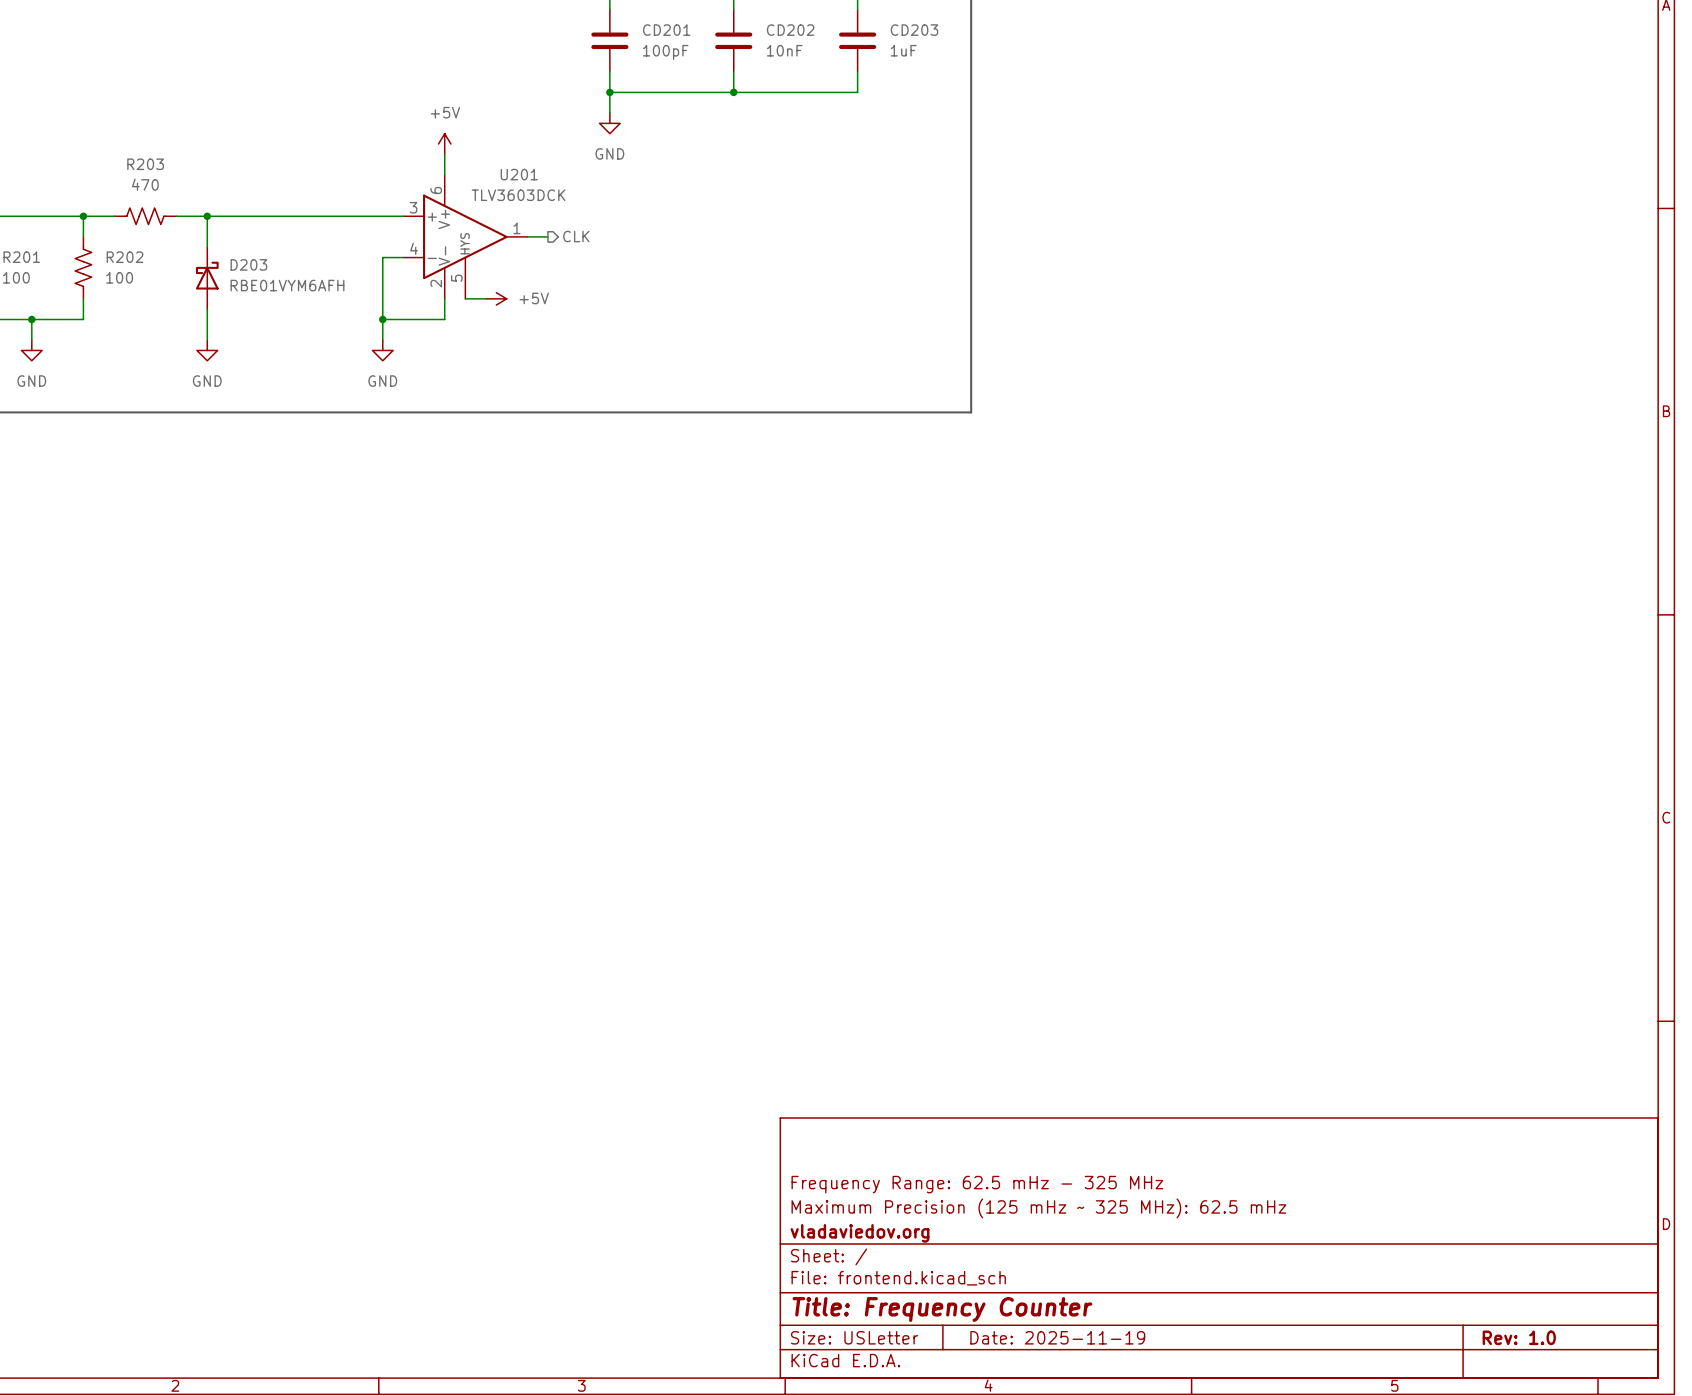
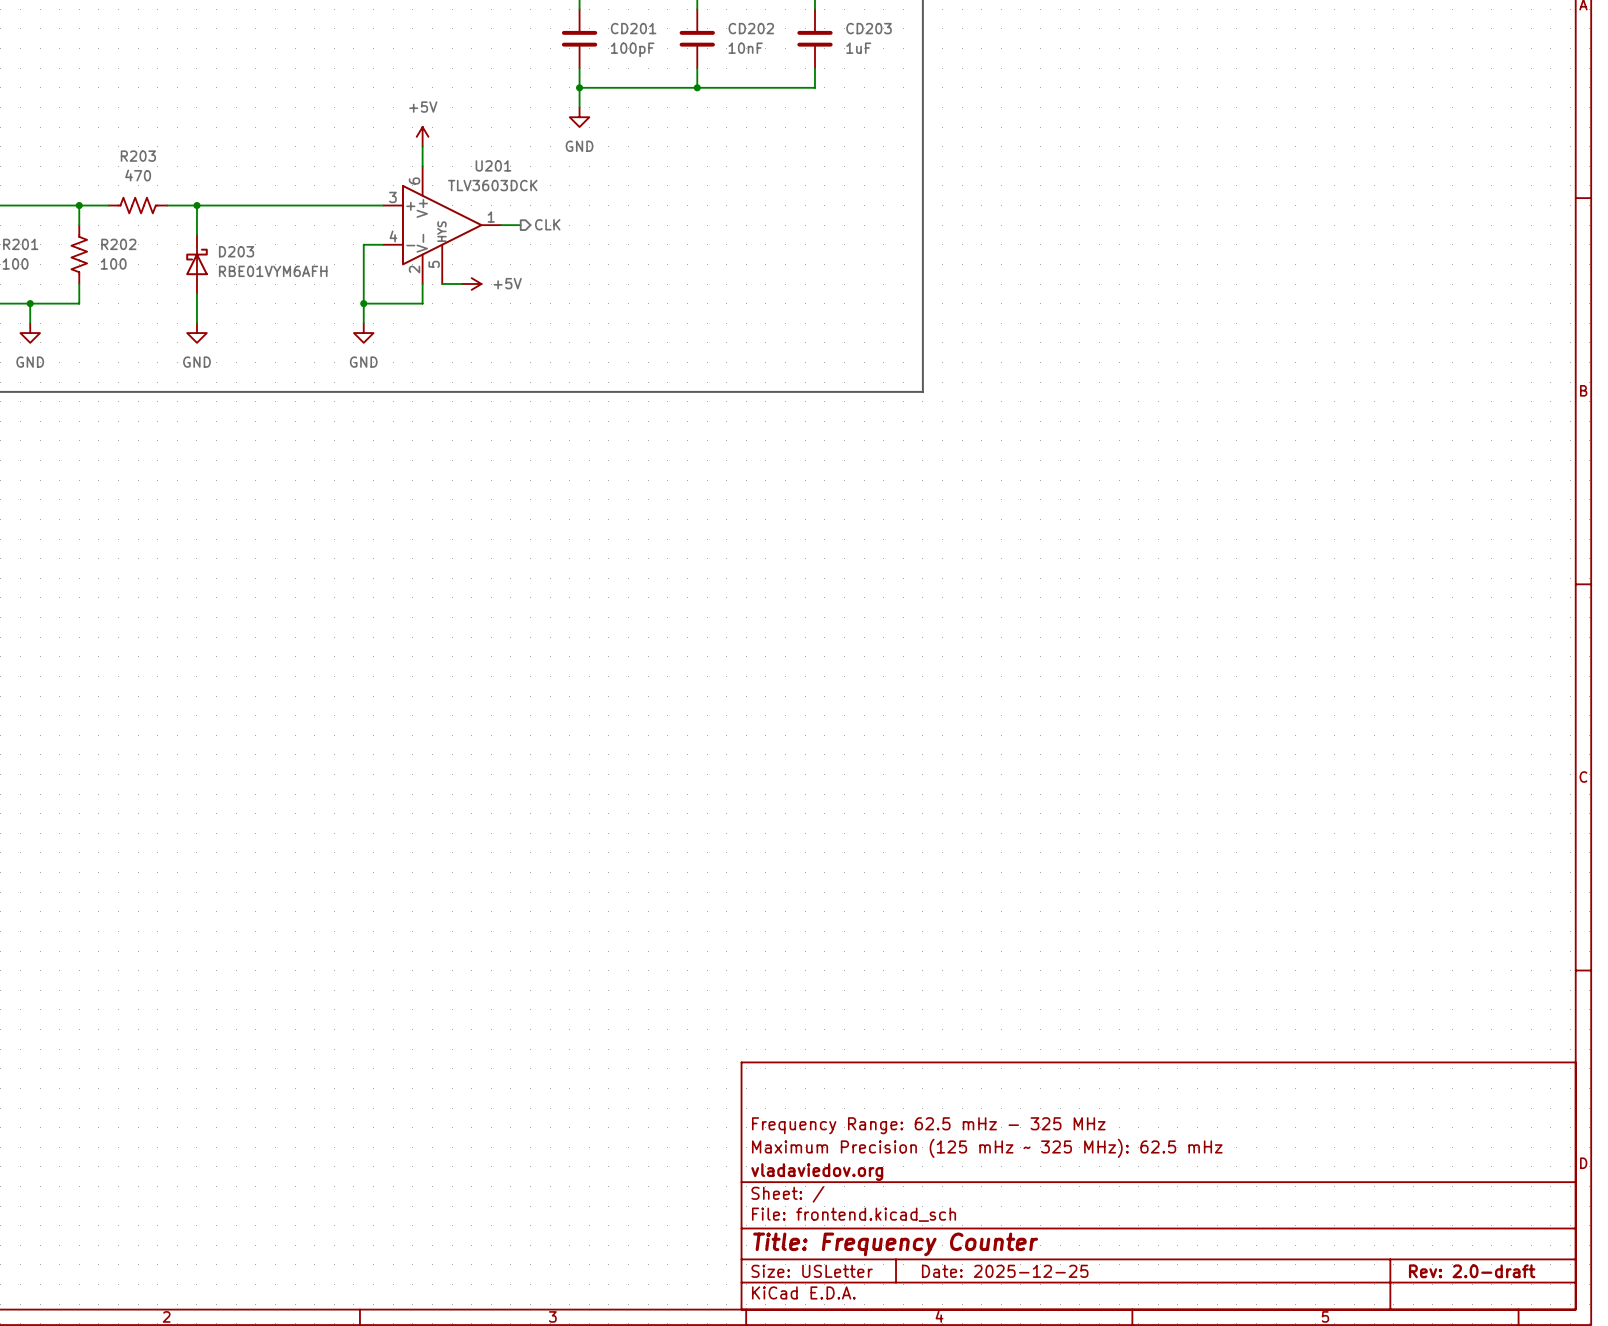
title block: Date: 2025-11-19 (1057, 1337) -> Date: 2025-12-25 (1005, 1271)
title block: Rev: 1.0 (1519, 1337) -> Rev: 2.0-draft (1472, 1271)

